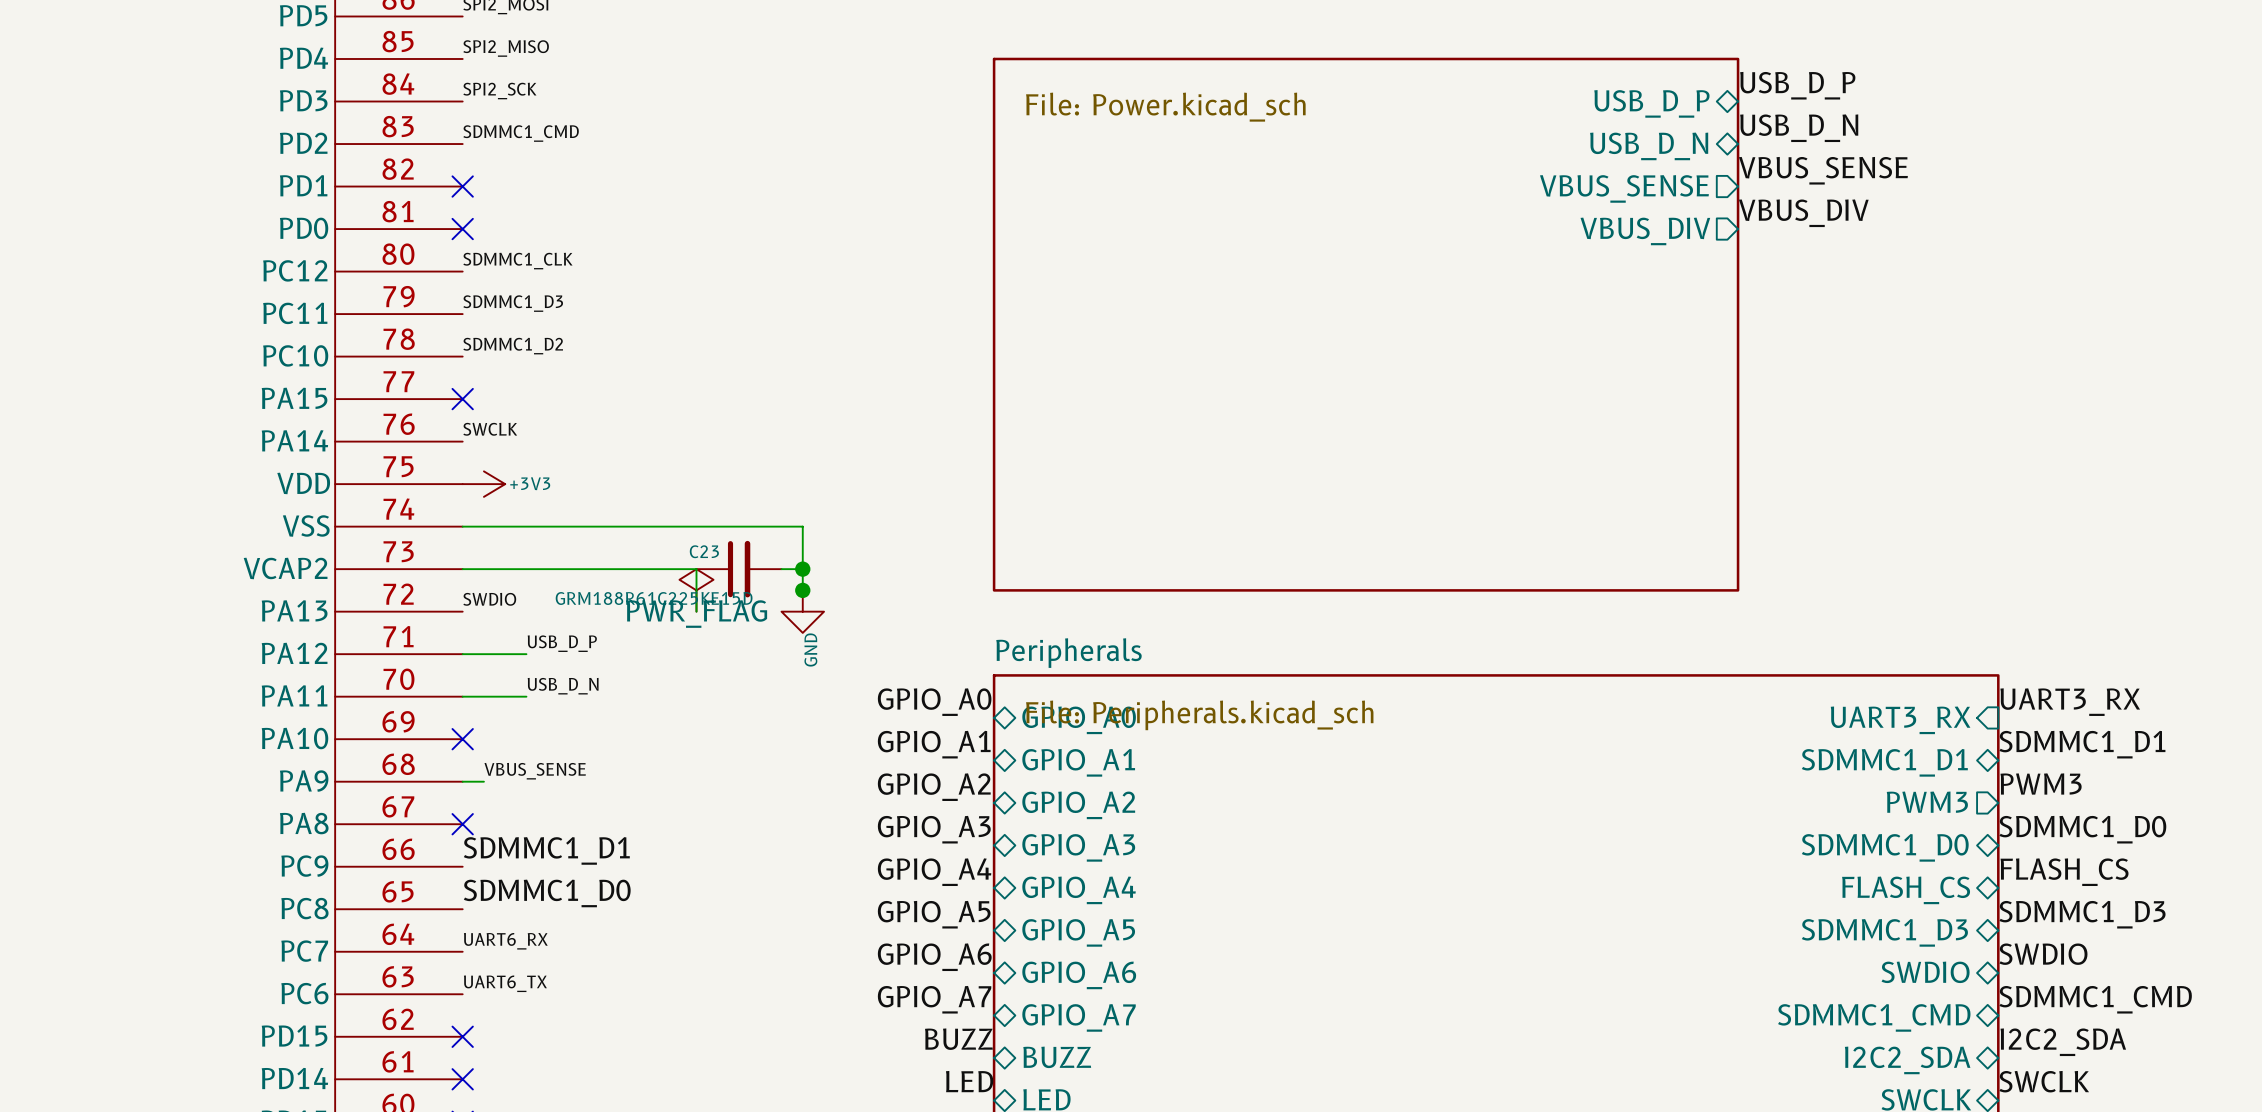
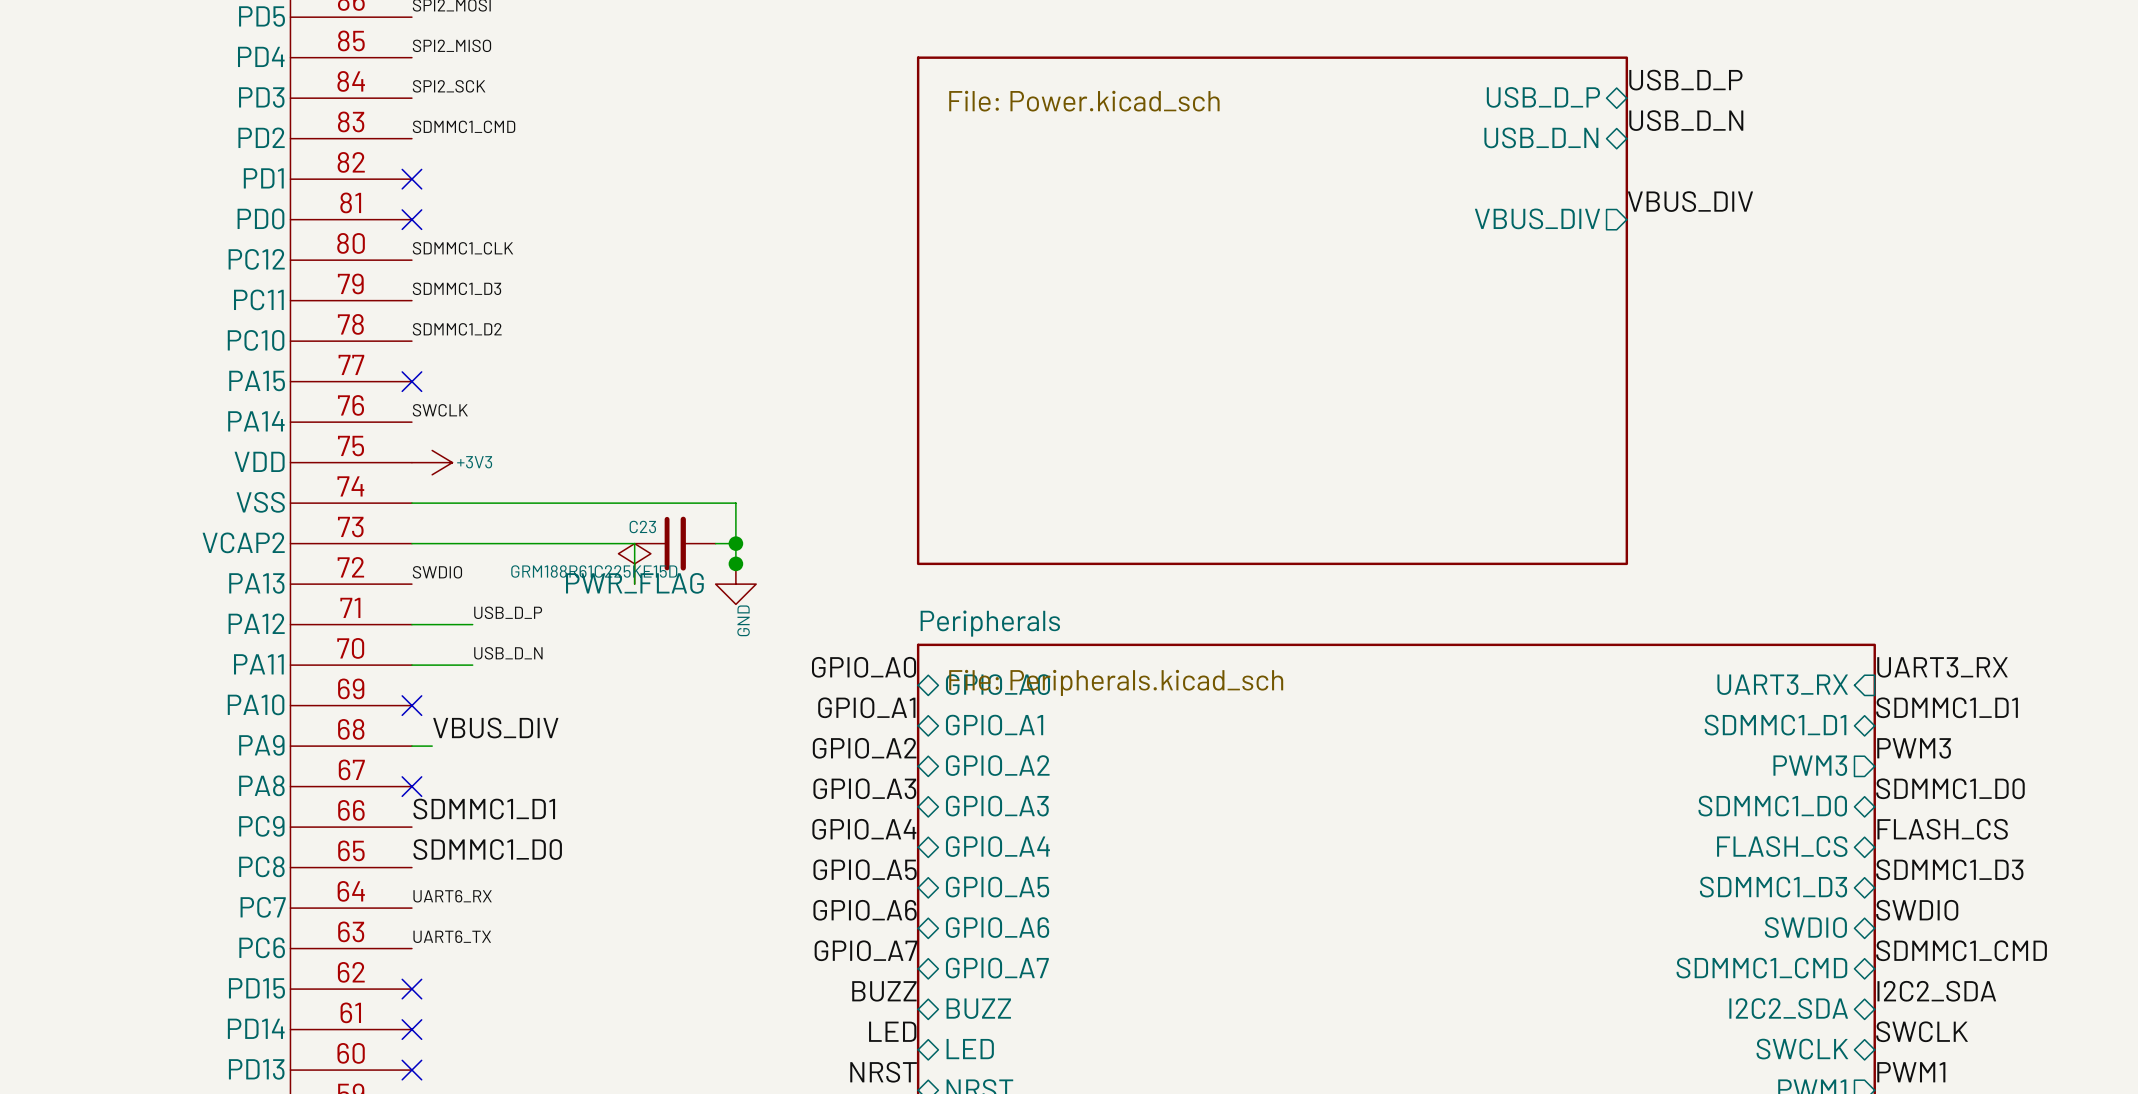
label: VBUS_SENSE (1823, 170) -> none
sheet pin: VBUS_SENSE (1624, 188) -> none
label: VBUS_SENSE (535, 771) -> VBUS_DIV (495, 728)

